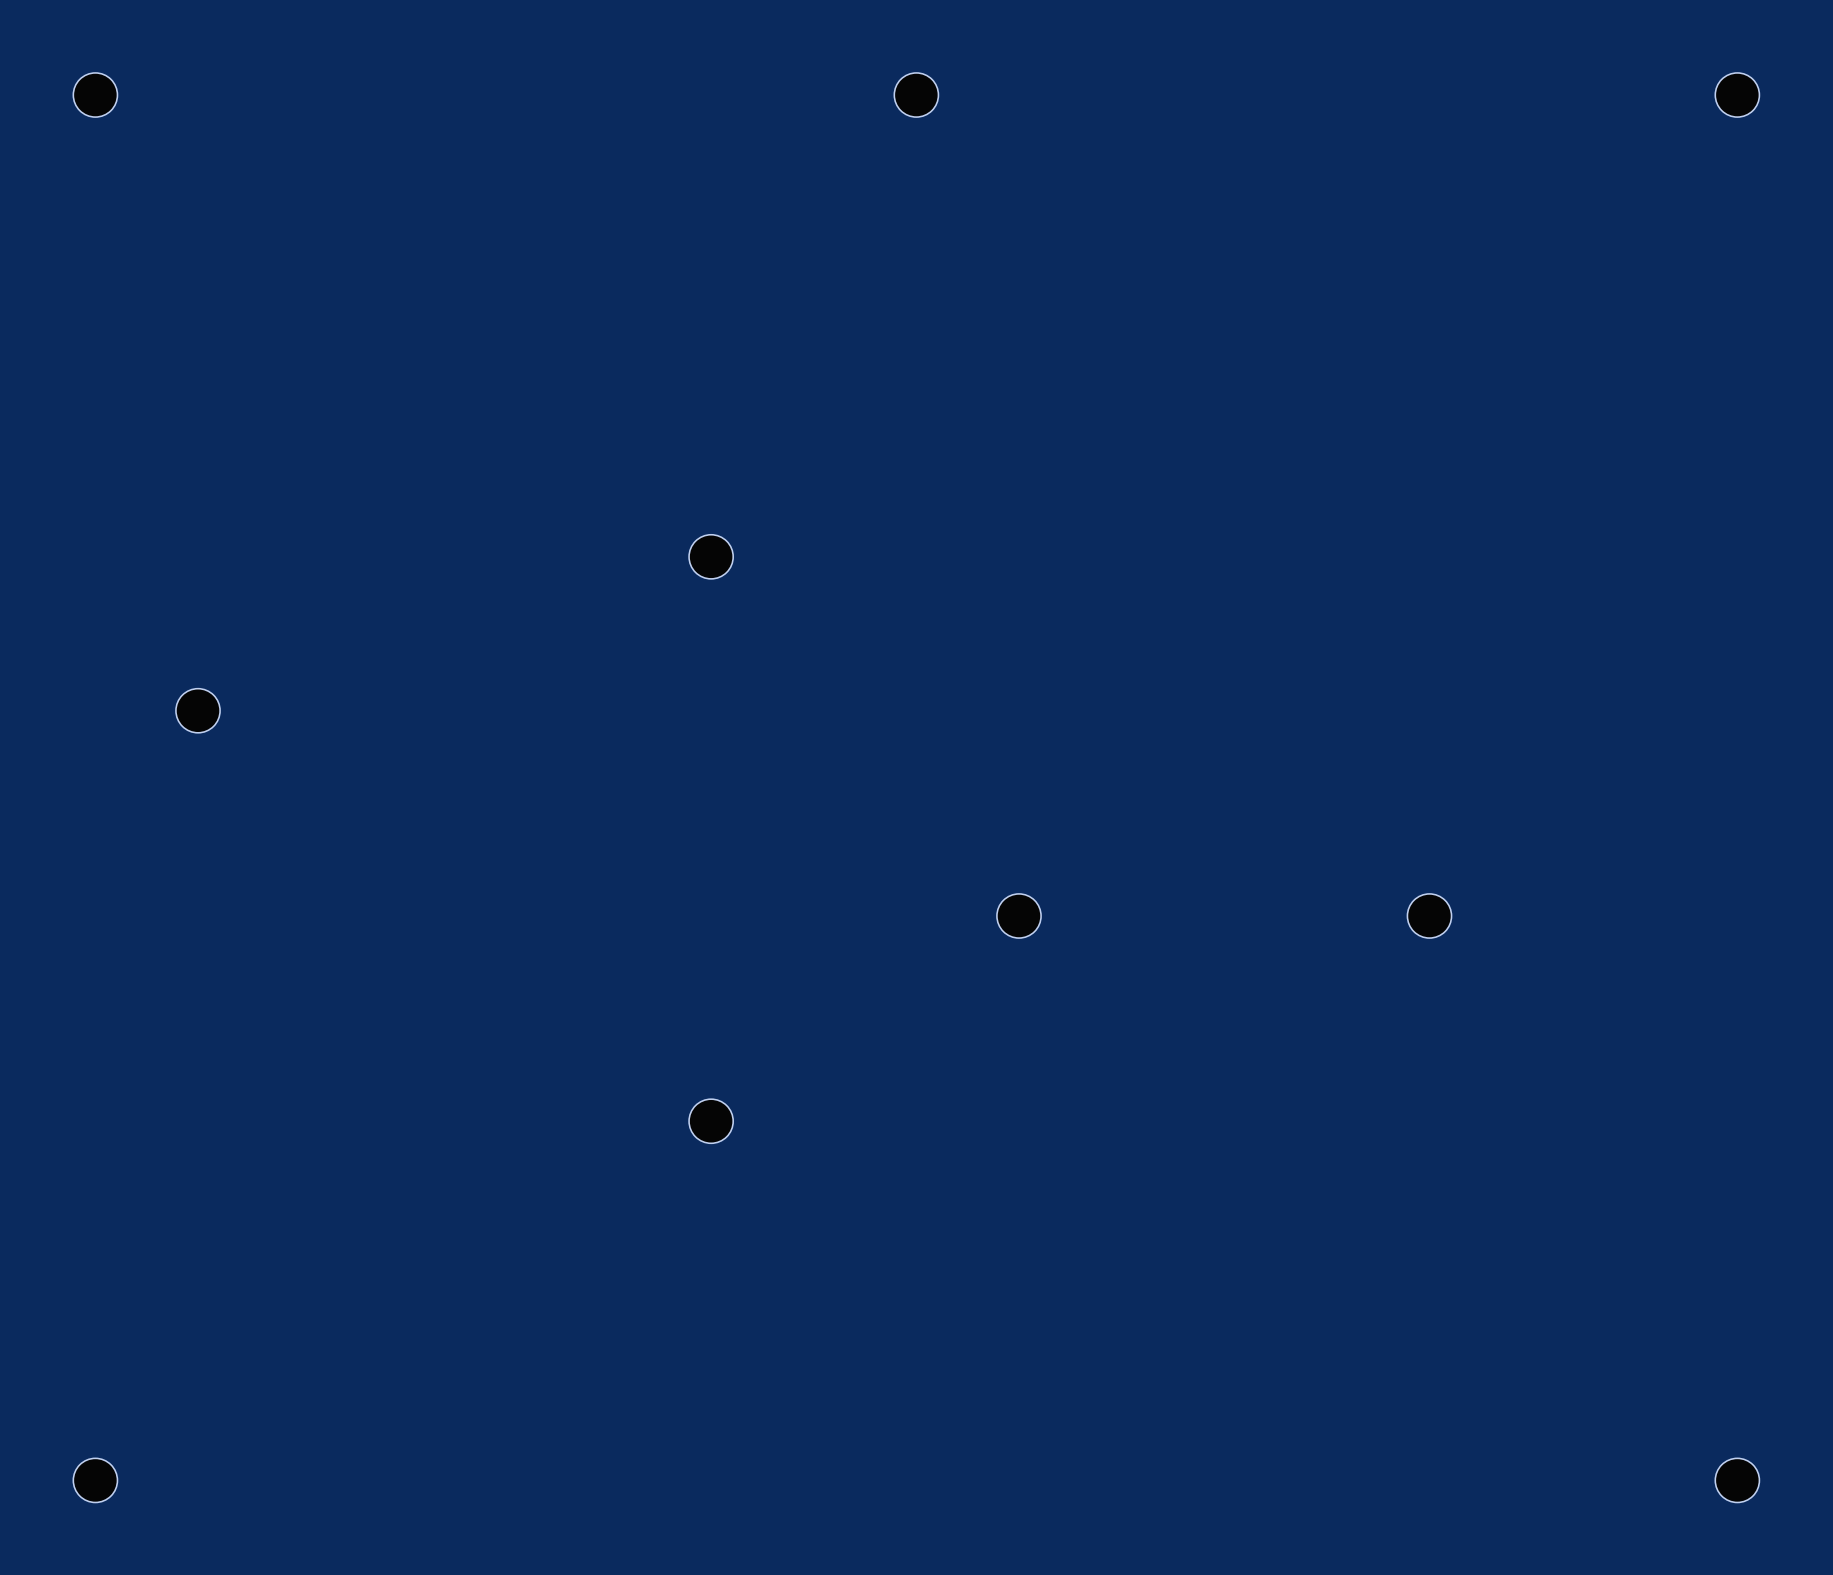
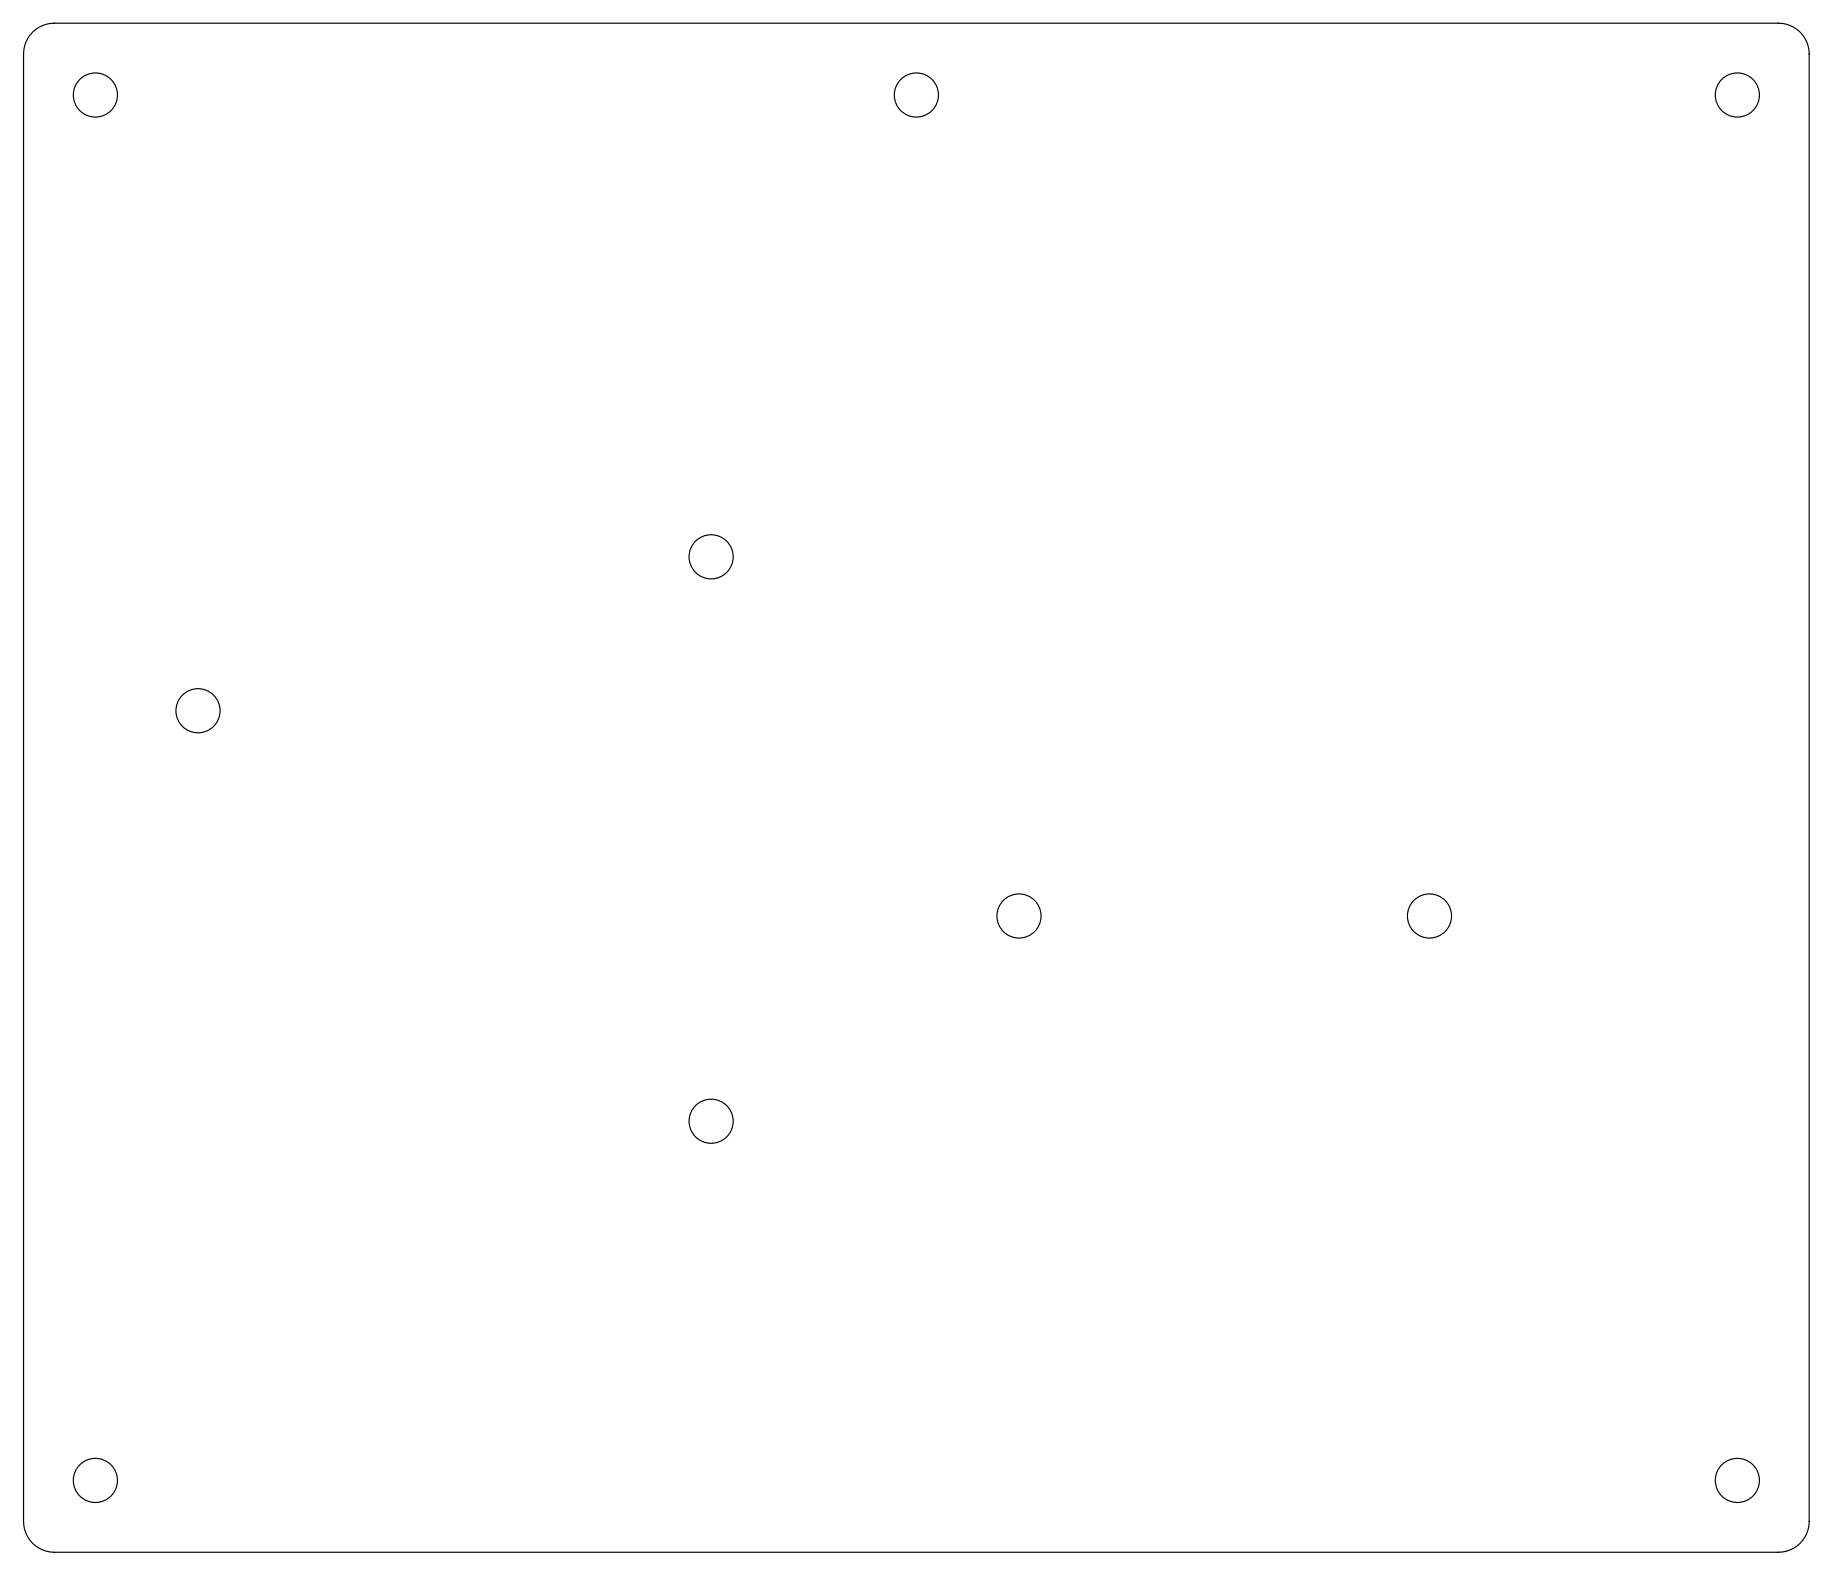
board edge: none -> (54, 23) (1778, 23) (1786, 24) (1797, 29) (1805, 38) (1809, 53) (1809, 1521) (1806, 1533) (1802, 1540) (1790, 1549) (1778, 1552) (54, 1552) (46, 1551) (35, 1545) (25, 1533) (23, 1521) (23, 53) (25, 42) (32, 32) (42, 25) (54, 23)

